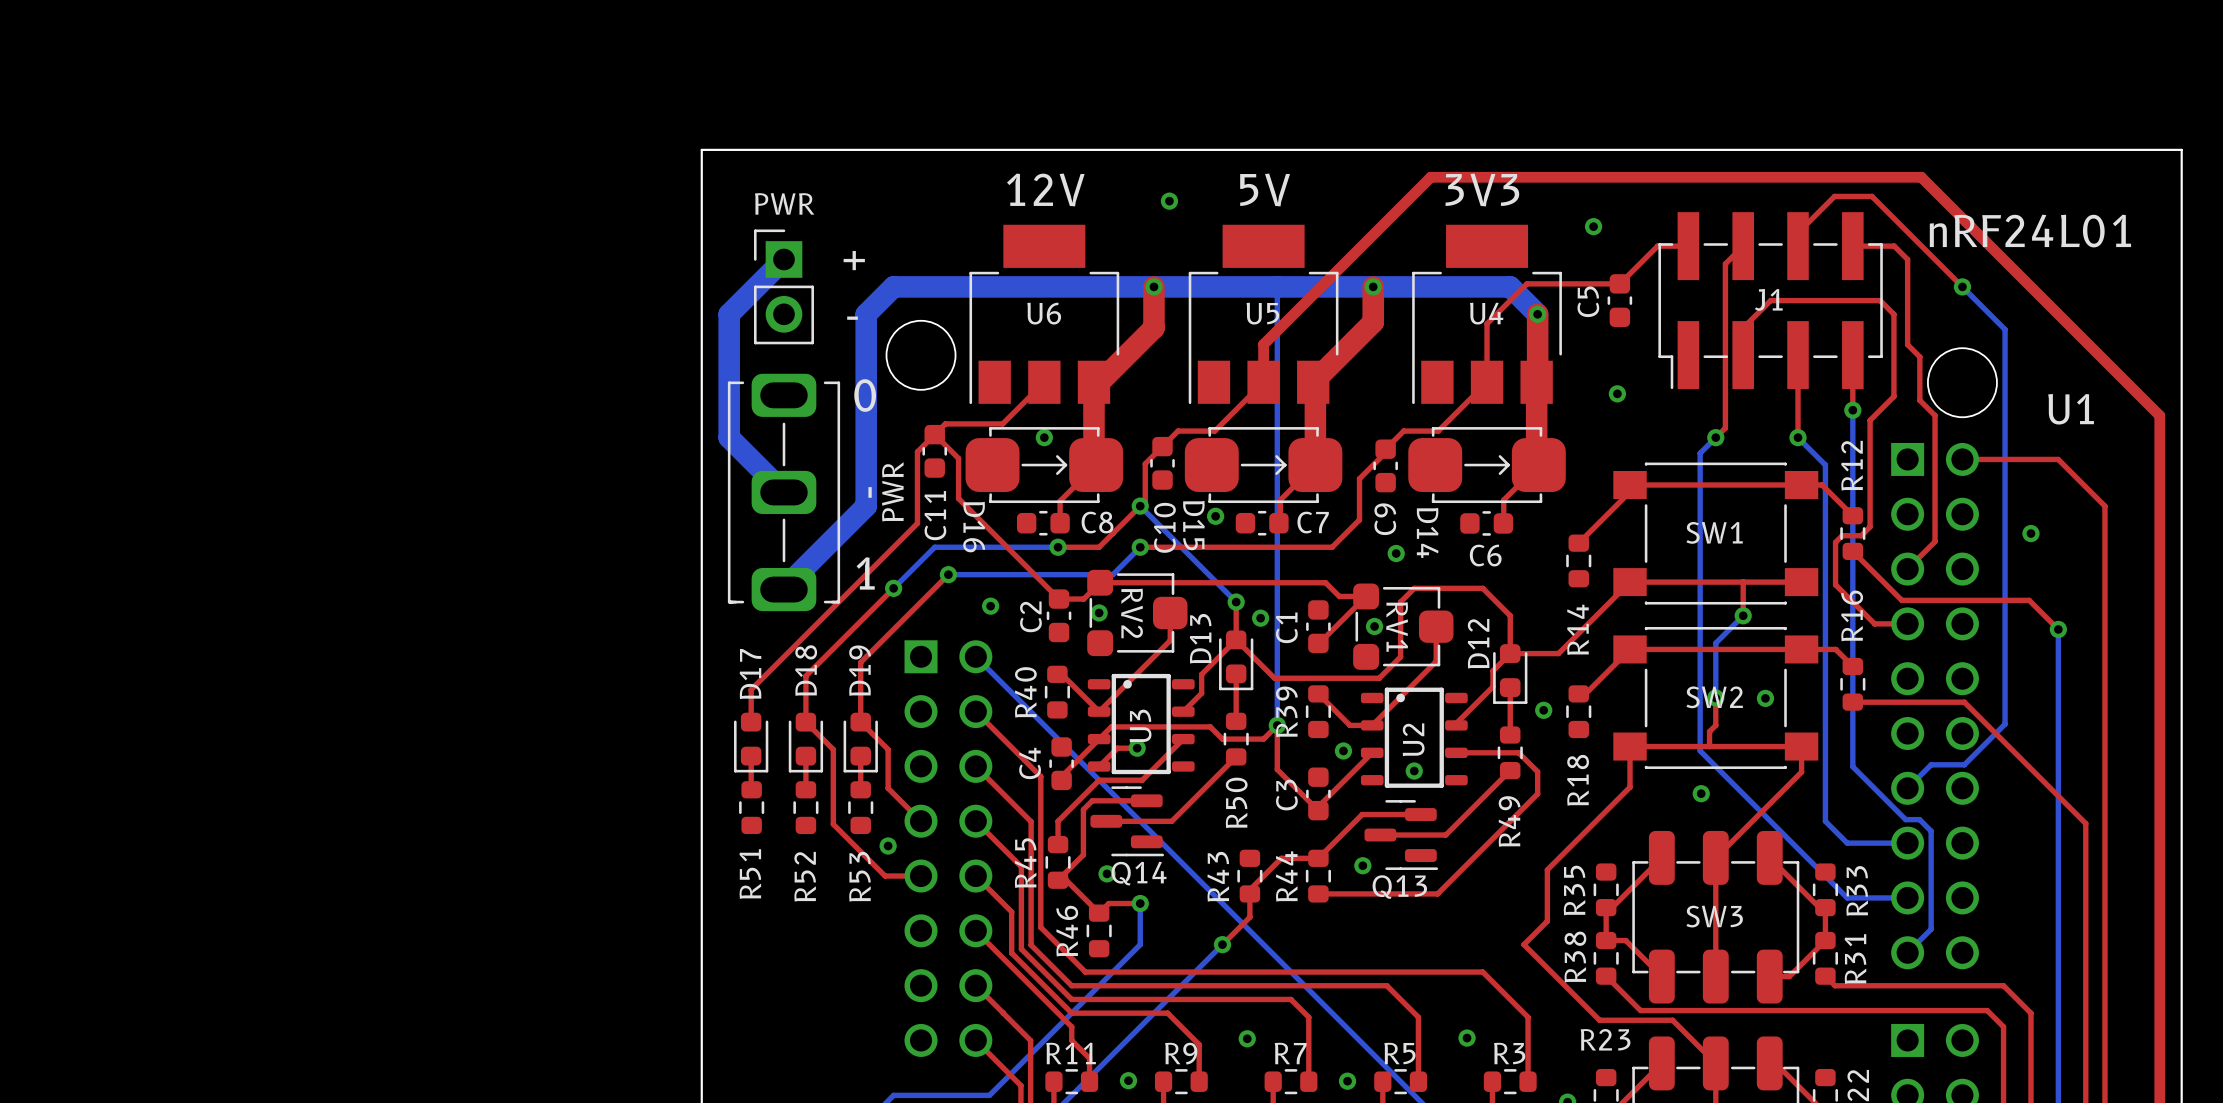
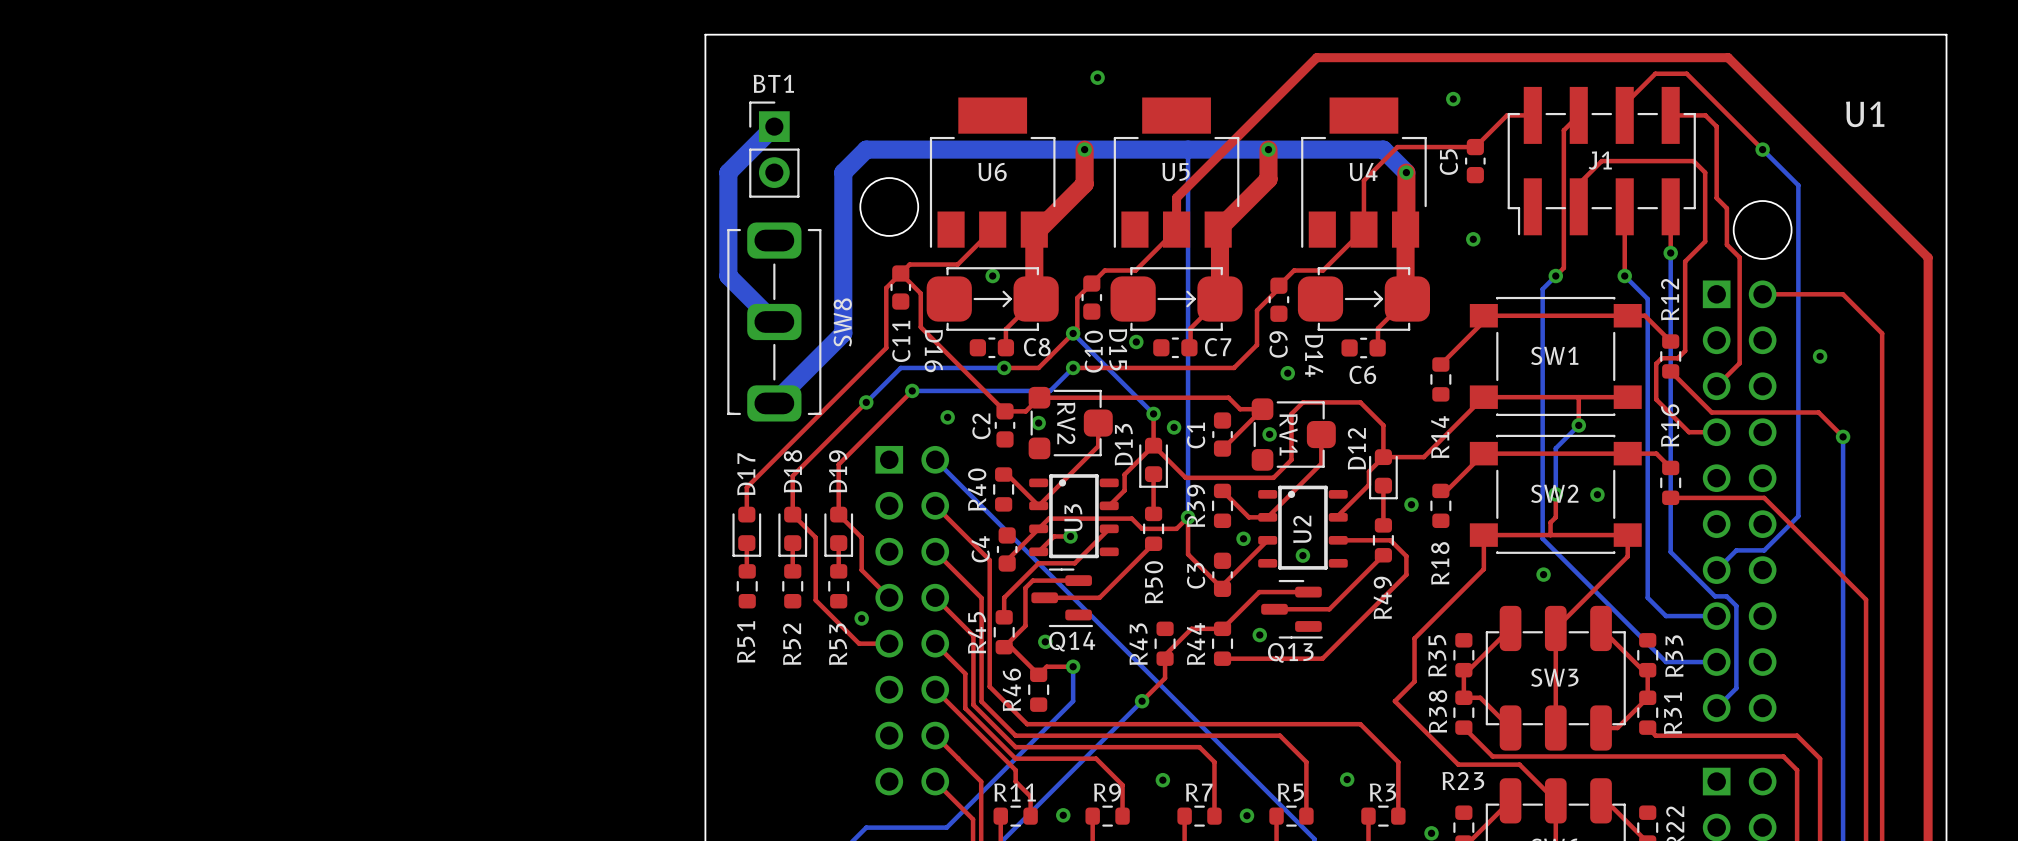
text: 12V (1045, 189) -> none
text: 5V (1265, 189) -> none
text: 3V3 (1482, 189) -> none
PWR name: PWR (784, 203) -> BT1 (773, 83)
text: nRF24L01 (2030, 231) -> none
text: + (854, 260) -> none
text: - (852, 318) -> none
text: 0 (865, 395) -> none
U1 name position: U1 (2071, 409) -> U1 (1865, 114)
PWR name: PWR (892, 491) -> SW8 (842, 322)
text: - (870, 492) -> none
text: 1 (865, 573) -> none

